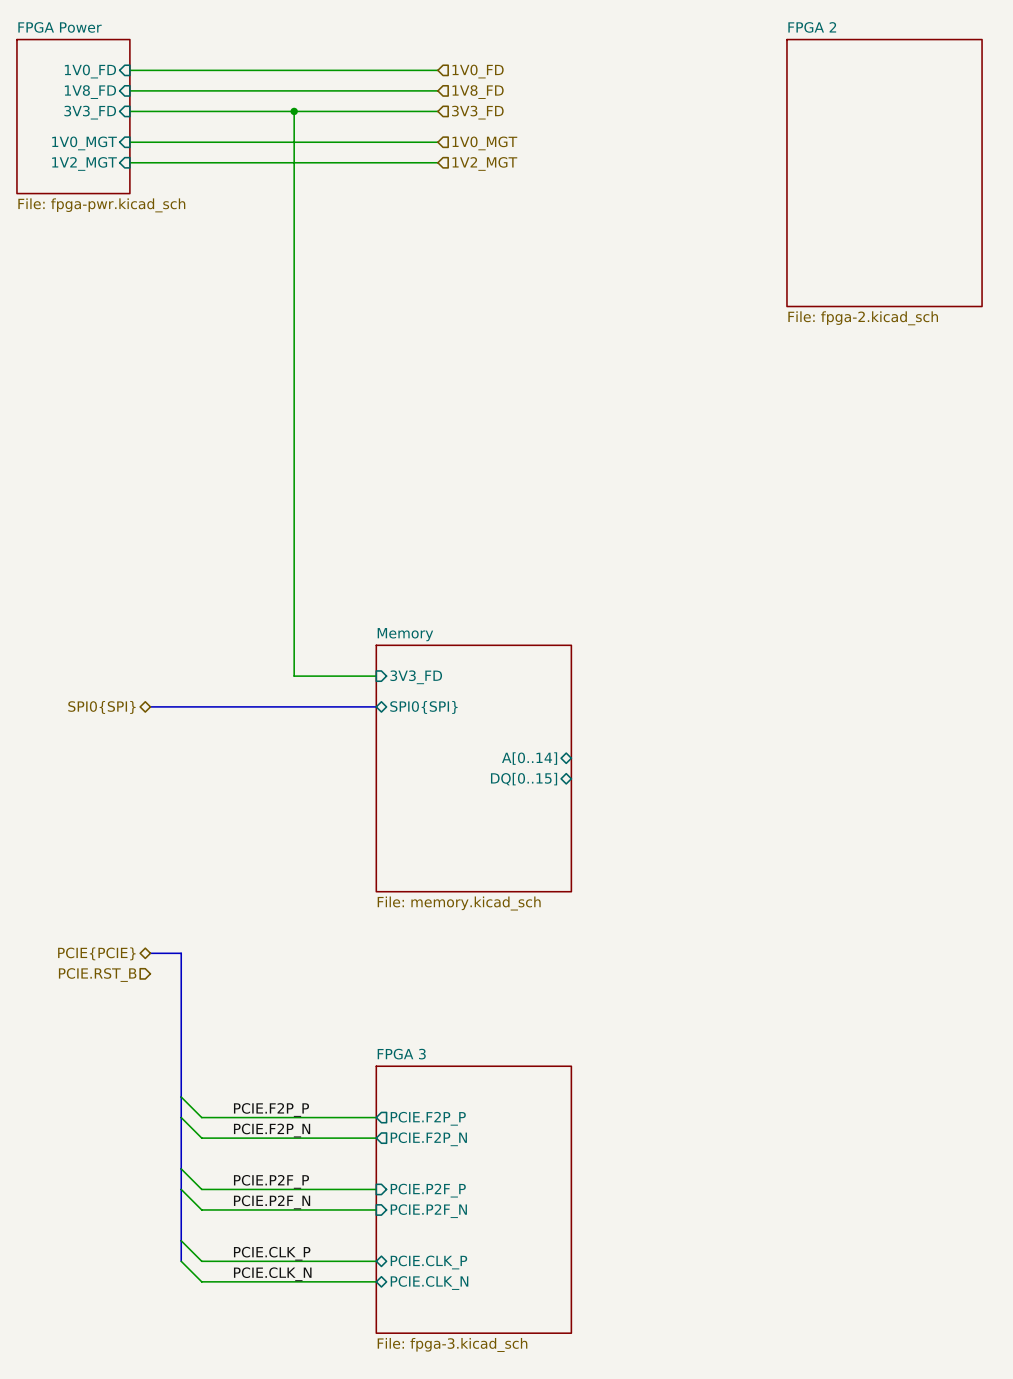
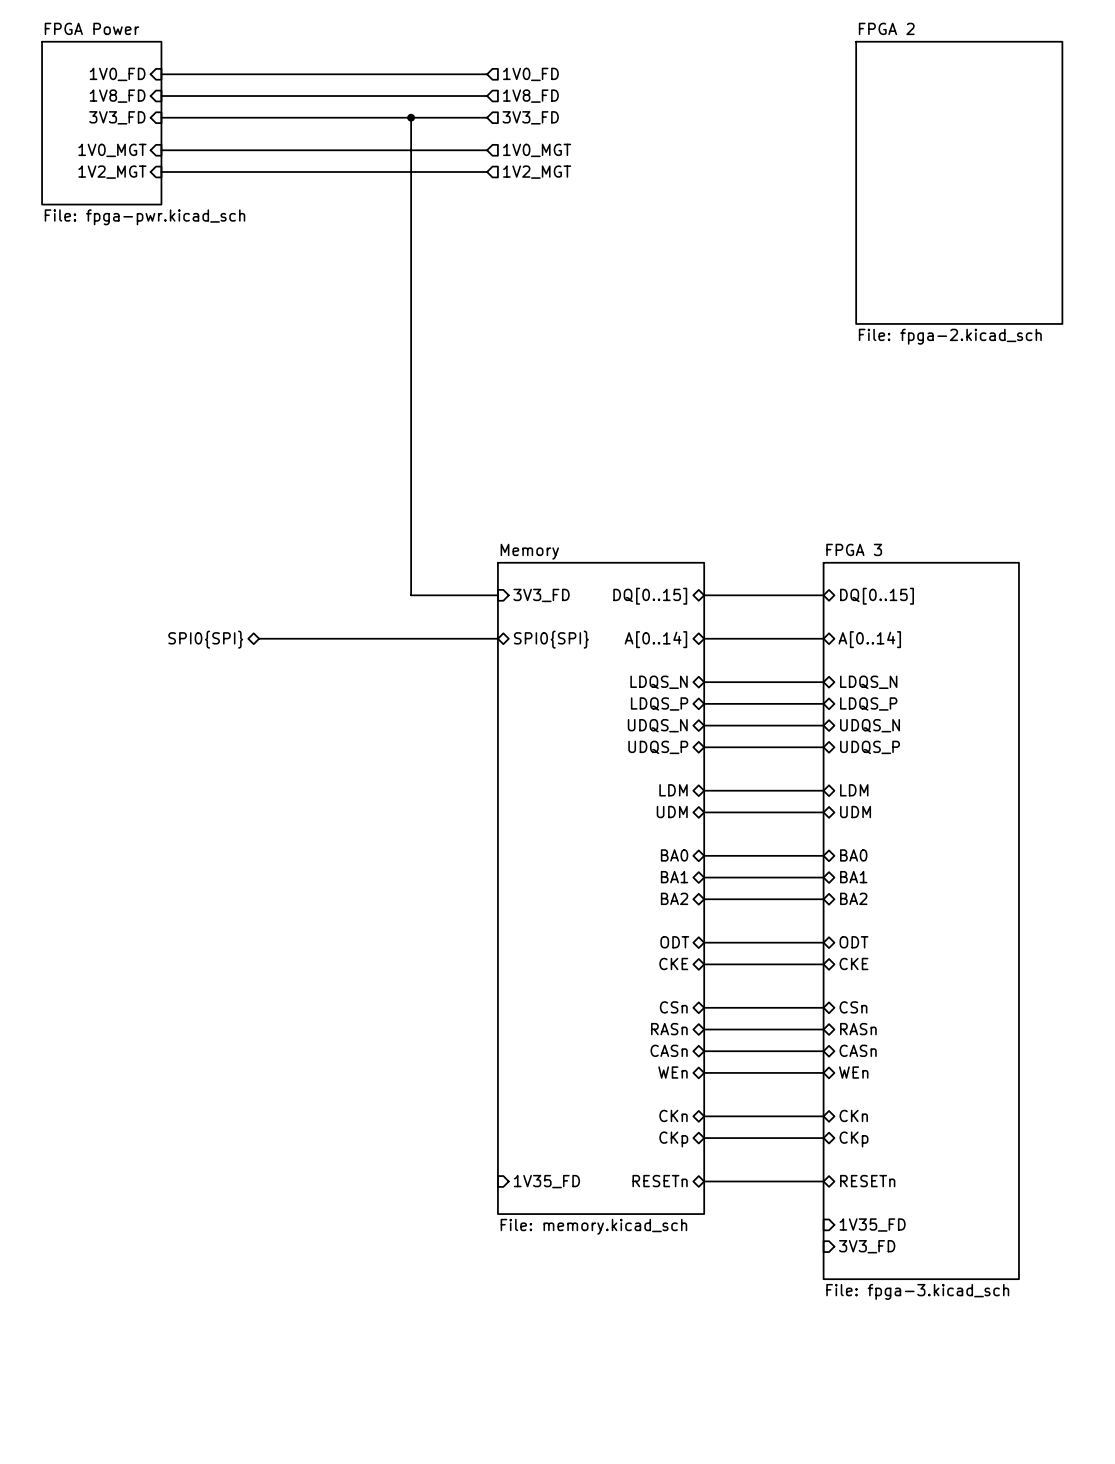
wire: (294, 111) (294, 676) (376, 676) -> none
junction: (294, 111) -> none
wire: none -> (411, 117) (411, 595) (497, 595)
junction: none -> (411, 117)
sheet pin: none -> DQ[0..15] (650, 596)
bus: none -> (704, 595) (823, 595)
sheet pin: none -> DQ[0..15] (877, 596)
sheet pin: none -> A[0..14] (655, 639)
bus: none -> (704, 638) (823, 638)
sheet pin: none -> A[0..14] (869, 639)
wire: none -> (704, 682) (823, 682)
sheet pin: none -> LDQS_N (659, 682)
sheet pin: none -> LDQS_N (868, 682)
wire: none -> (704, 703) (823, 703)
sheet pin: none -> LDQS_P (659, 703)
sheet pin: none -> LDQS_P (868, 703)
sheet pin position: 3V3_FD (416, 677) -> 3V3_FD (541, 595)
wire: none -> (704, 725) (823, 725)
sheet pin: none -> UDQS_N (657, 725)
sheet pin: none -> UDQS_N (870, 725)
bus: (150, 706) (376, 706) -> (259, 638) (497, 638)
wire: none -> (704, 747) (823, 747)
hierarchical label position: SPI0{SPI} (101, 707) -> SPI0{SPI} (205, 639)
sheet pin position: SPI0{SPI} (423, 707) -> SPI0{SPI} (551, 639)
sheet pin: none -> UDQS_P (658, 747)
sheet pin: none -> UDQS_P (870, 747)
sheet pin: none -> LDM (673, 790)
wire: none -> (704, 790) (823, 790)
sheet pin: none -> LDM (854, 790)
sheet pin: A[0..14] (529, 758) -> none
sheet Memory: File: memory.kicad_sch (473, 768) -> none
sheet pin: none -> UDM (672, 812)
wire: none -> (704, 812) (823, 812)
sheet pin: none -> UDM (855, 812)
sheet pin: DQ[0..15] (524, 779) -> none
sheet pin: none -> BA0 (674, 855)
wire: none -> (704, 855) (823, 855)
sheet pin: none -> BA0 (853, 855)
sheet pin: none -> BA1 (674, 877)
sheet pin: none -> BA1 (853, 877)
wire: none -> (704, 877) (823, 877)
sheet Memory: none -> File: memory.kicad_sch (601, 888)
sheet pin: none -> BA2 (674, 898)
wire: none -> (704, 899) (823, 899)
sheet pin: none -> BA2 (853, 898)
sheet pin: none -> ODT (674, 942)
wire: none -> (704, 942) (823, 942)
sheet pin: none -> ODT (854, 942)
sheet pin: none -> CKE (673, 963)
sheet pin: none -> CKE (854, 963)
wire: none -> (704, 964) (823, 964)
sheet pin: none -> CSn (673, 1007)
sheet pin: none -> CSn (853, 1007)
hierarchical label: PCIE{PCIE} (96, 953) -> none
bus: (150, 953) (181, 953) (181, 1261) -> none
wire: none -> (704, 1007) (823, 1007)
sheet pin: none -> RASn (669, 1029)
wire: none -> (704, 1029) (823, 1029)
sheet pin: none -> RASn (858, 1029)
hierarchical label: PCIE.RST_B (97, 975) -> none
sheet pin: none -> CASn (669, 1050)
wire: none -> (704, 1051) (823, 1051)
sheet pin: none -> CASn (858, 1050)
sheet pin: none -> WEn (673, 1072)
wire: none -> (704, 1072) (823, 1072)
sheet pin: none -> WEn (853, 1072)
sheet FPGA 3 name position: FPGA 3 (401, 1054) -> FPGA 3 (854, 549)
sheet pin: none -> CKn (673, 1115)
wire: none -> (704, 1116) (823, 1116)
sheet pin: none -> CKn (853, 1115)
sheet FPGA 3 shape: [375, 1065, 572, 1334] -> [822, 562, 1020, 1280]
wire: none -> (704, 1138) (823, 1138)
sheet pin: none -> CKp (673, 1139)
sheet pin: none -> CKp (854, 1139)
wire: (181, 1097) (201, 1117) (376, 1117) -> none
label: PCIE.F2P_P (271, 1109) -> none
wire: (181, 1117) (201, 1138) (376, 1138) -> none
sheet pin: none -> RESETn (660, 1181)
wire: none -> (704, 1181) (823, 1181)
sheet pin: none -> RESETn (867, 1181)
sheet pin: PCIE.F2P_P (428, 1118) -> none
sheet pin: none -> 1V35_FD (546, 1181)
label: PCIE.F2P_N (272, 1130) -> none
sheet pin: PCIE.F2P_N (428, 1139) -> none
sheet pin: none -> 1V35_FD (872, 1225)
wire: (181, 1168) (201, 1189) (376, 1189) -> none
sheet pin: none -> 3V3_FD (867, 1246)
label: PCIE.P2F_P (271, 1181) -> none
wire: (181, 1189) (201, 1209) (376, 1209) -> none
sheet pin: PCIE.P2F_P (428, 1190) -> none
label: PCIE.P2F_N (272, 1202) -> none
sheet pin: PCIE.P2F_N (428, 1211) -> none
wire: (181, 1240) (201, 1261) (376, 1261) -> none
label: PCIE.CLK_P (272, 1253) -> none
wire: (181, 1261) (201, 1281) (376, 1281) -> none
sheet pin: PCIE.CLK_P (428, 1262) -> none
label: PCIE.CLK_N (272, 1274) -> none
sheet pin: PCIE.CLK_N (429, 1283) -> none
sheet FPGA 3 value position: File: fpga-3.kicad_sch (452, 1344) -> File: fpga-3.kicad_sch (917, 1291)

